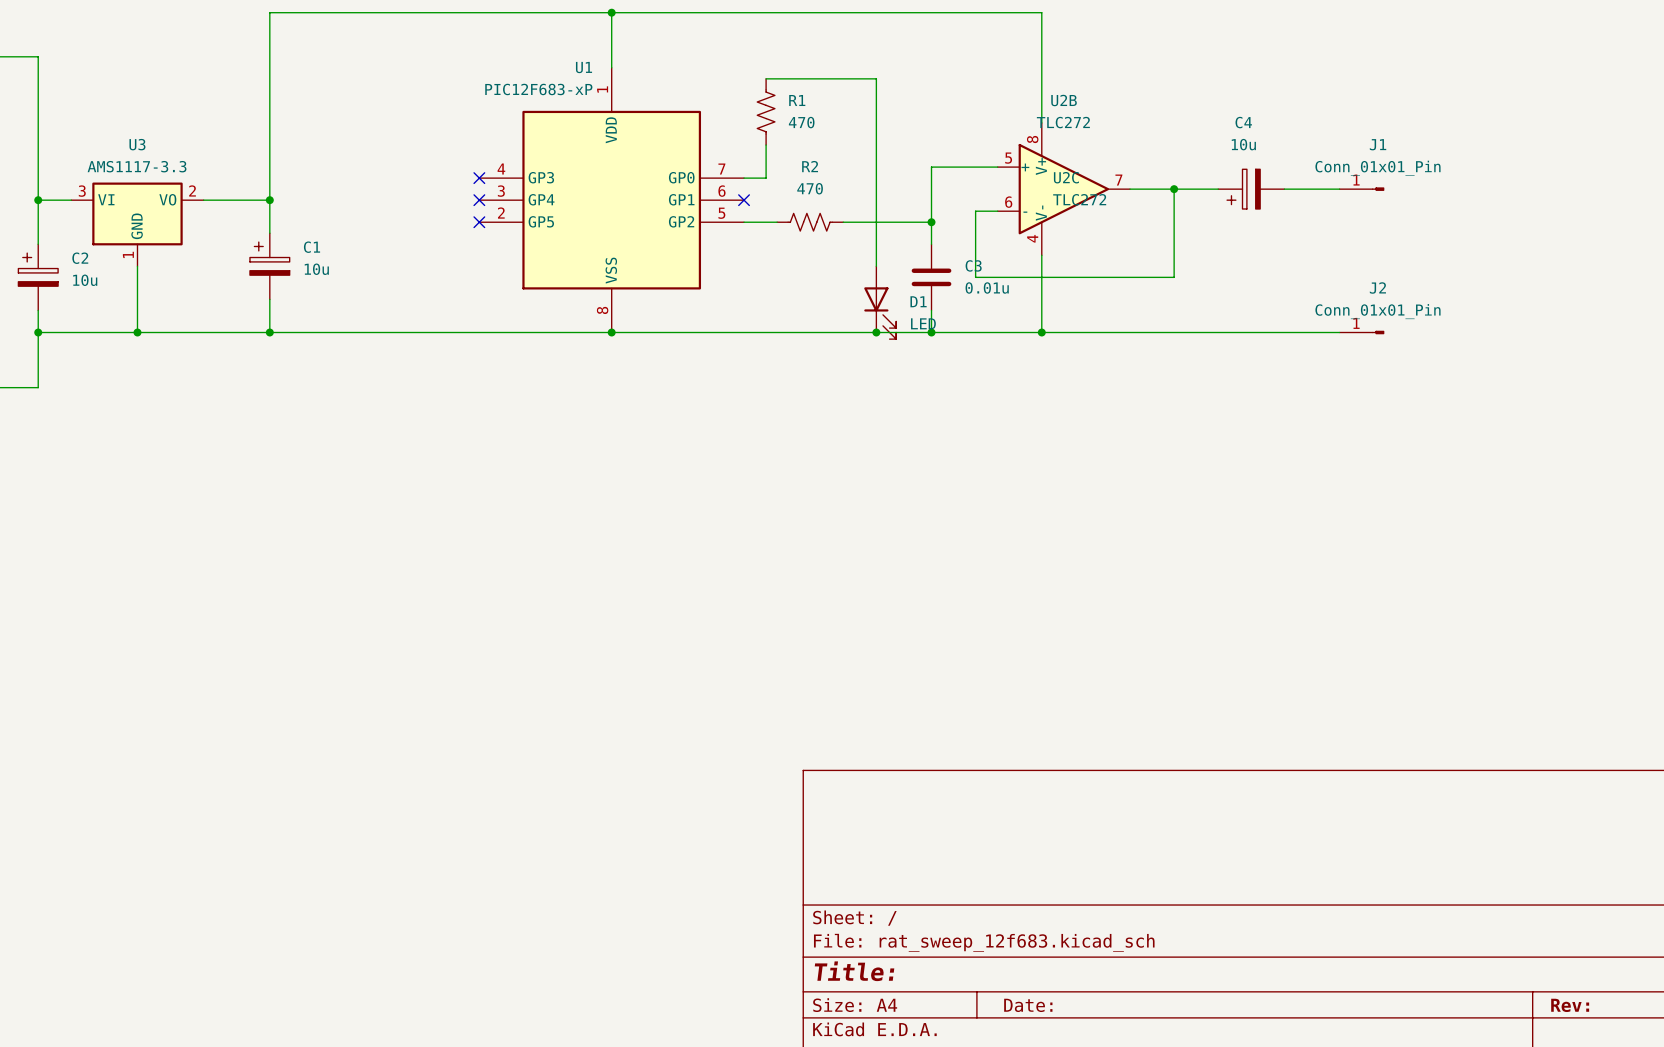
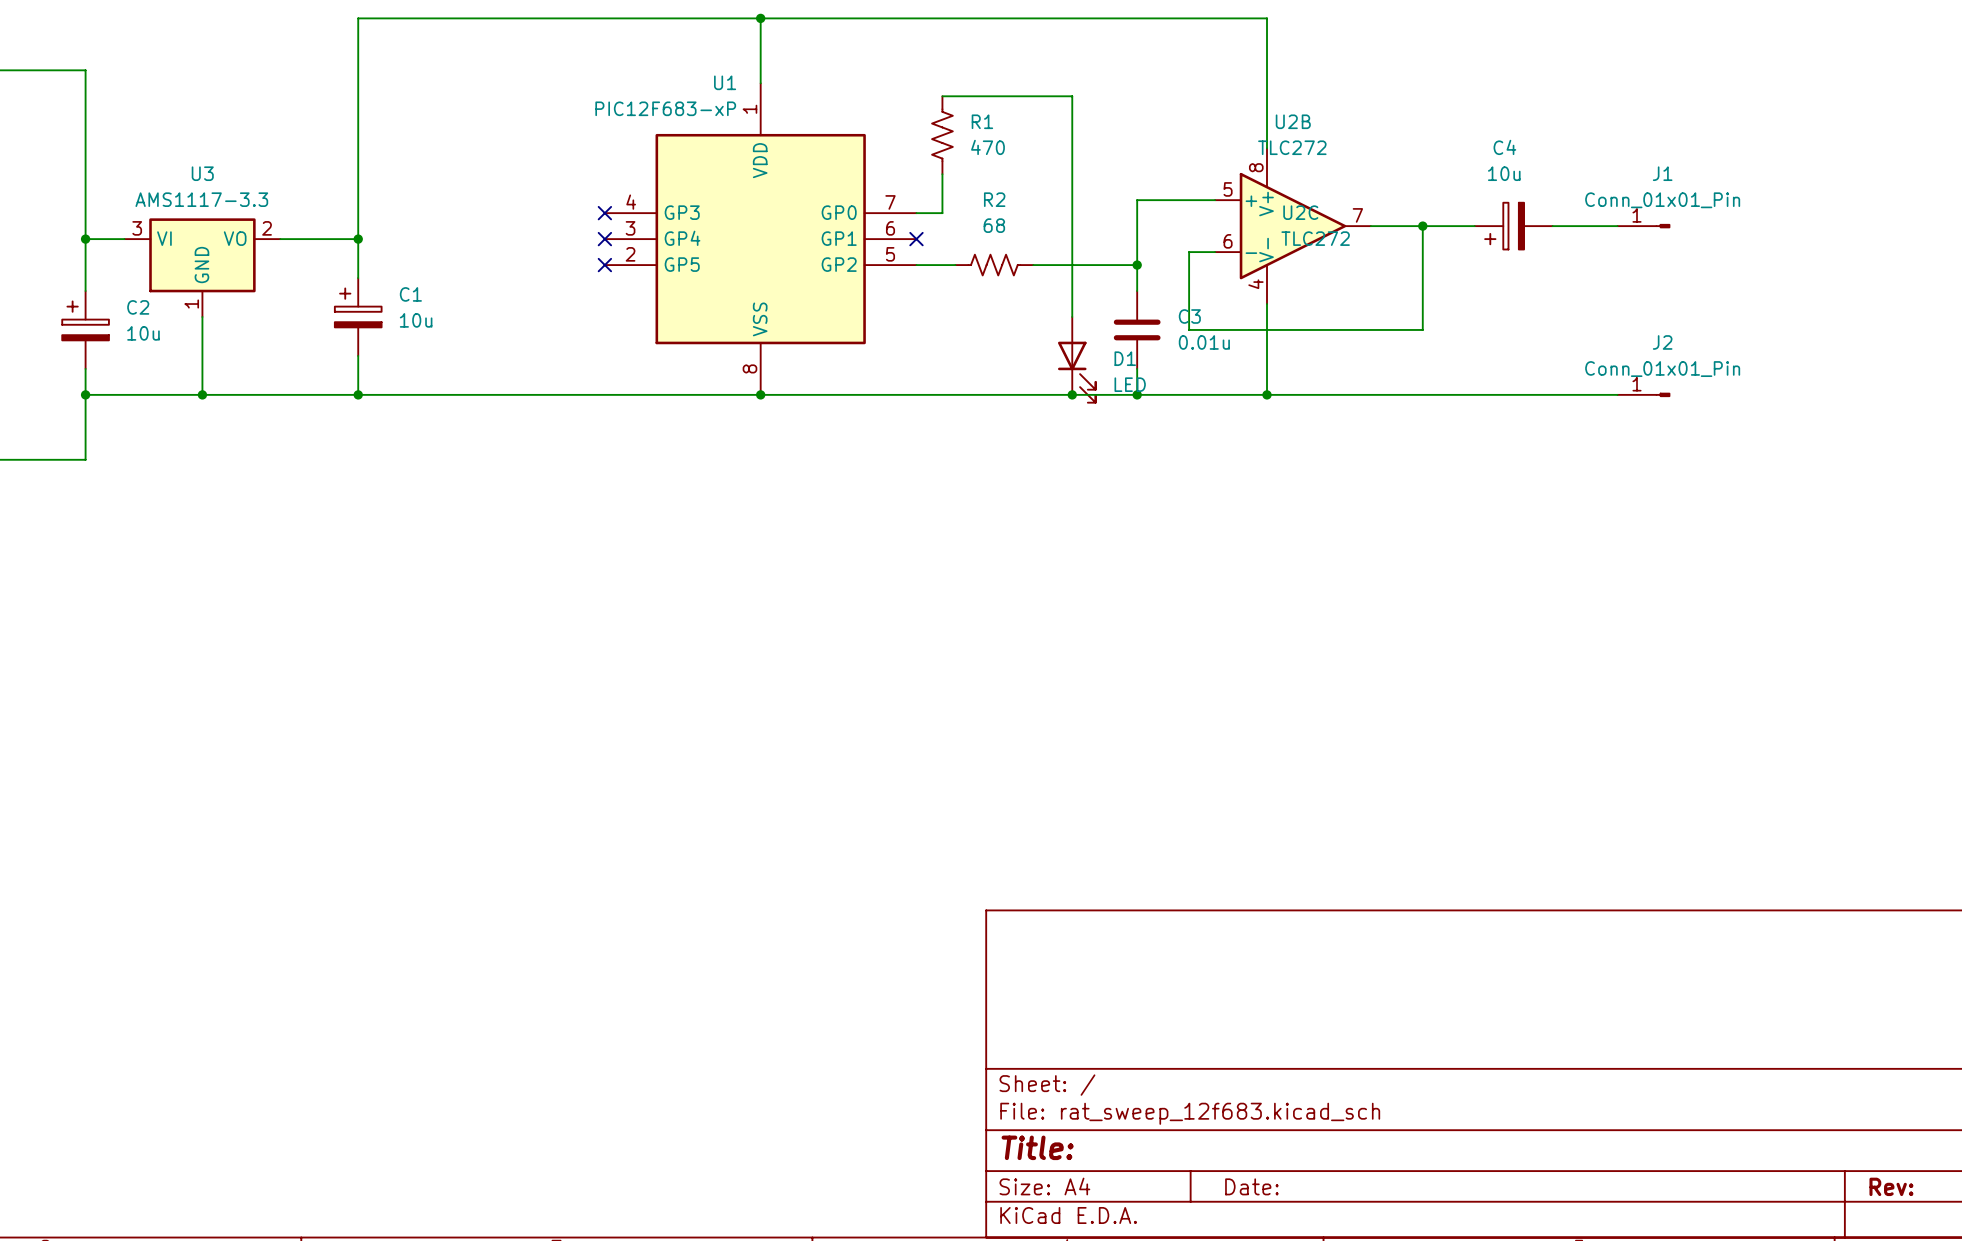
R2 value: 470 (810, 188) -> 68 (994, 225)

